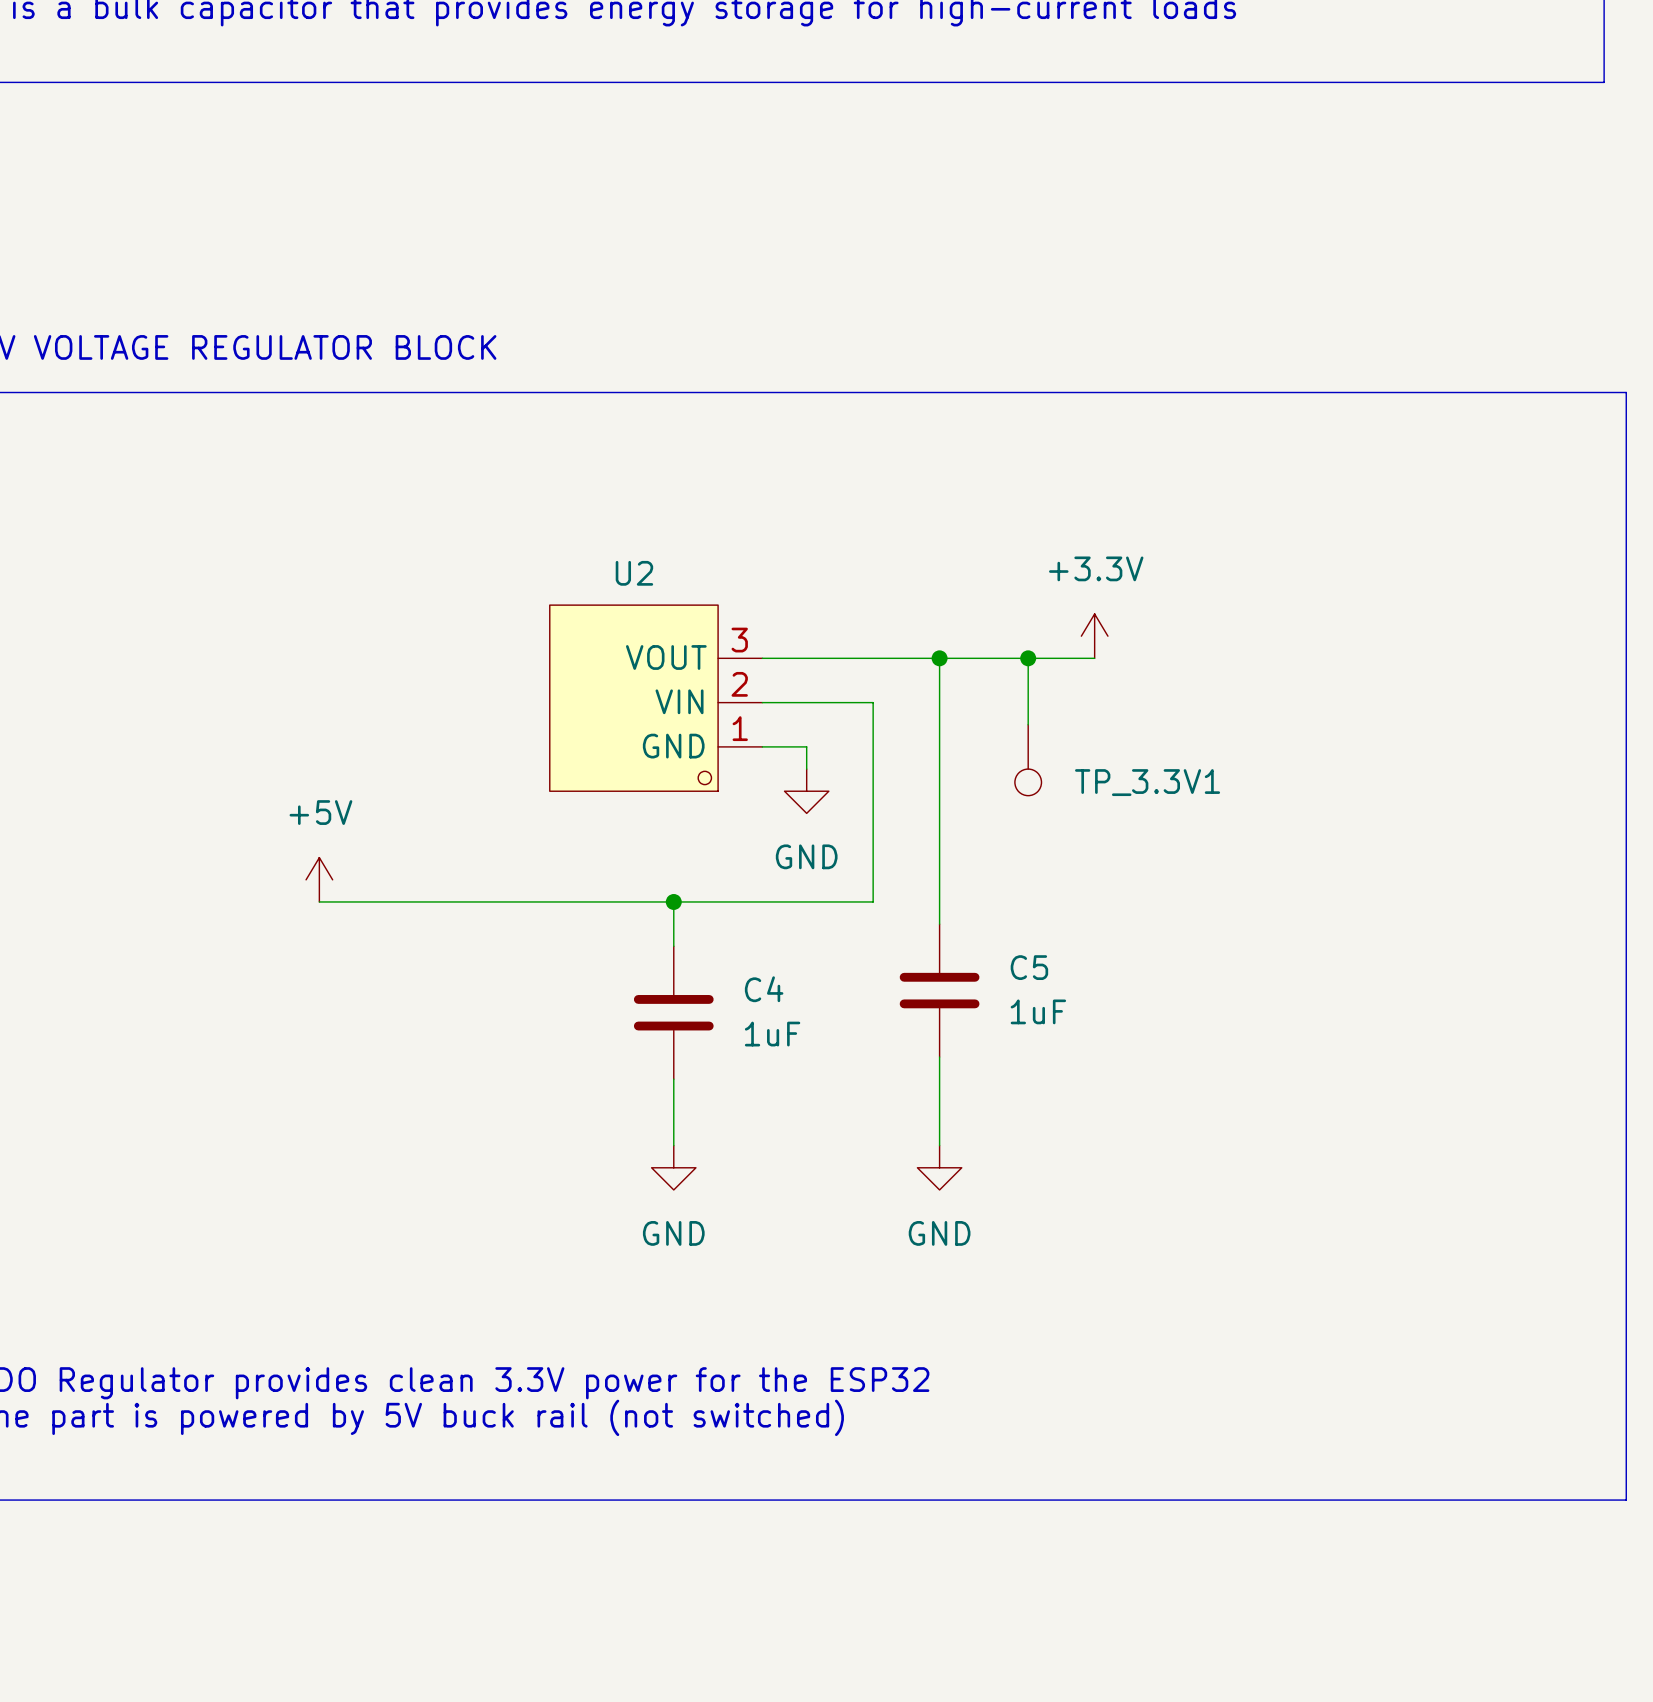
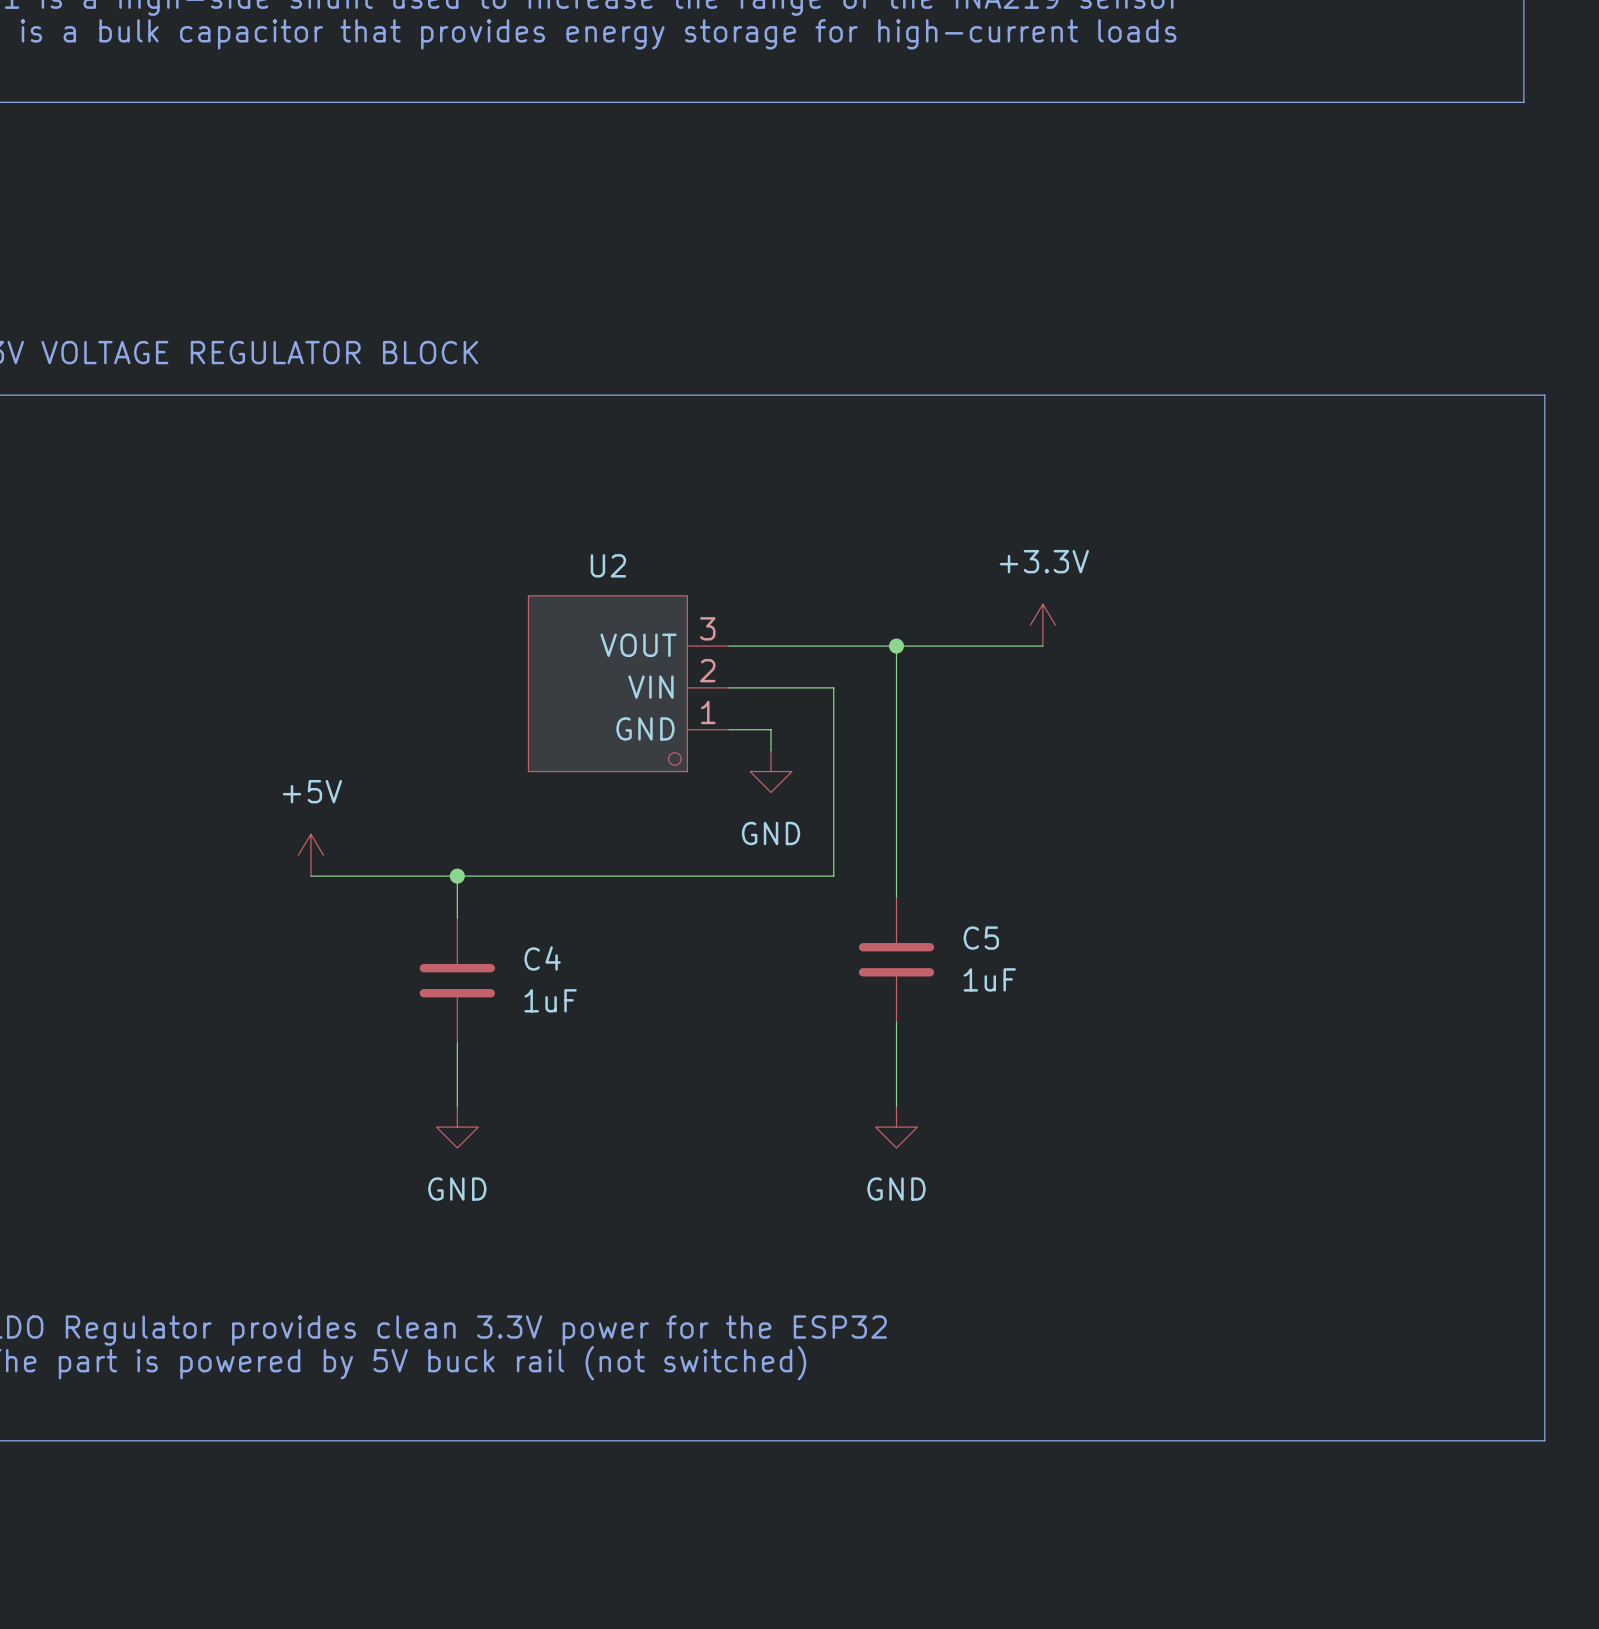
wire: (1028, 658) (1028, 724) -> none
junction: (1028, 658) -> none
TP_3.3V1: (1028, 760) -> none
junction: none -> (457, 876)
wire: (673, 901) (673, 946) -> (457, 876) (457, 917)
junction: (673, 901) -> none
C4 position: (673, 1012) -> (457, 980)
wire: (673, 1079) (673, 1145) -> (457, 1043) (457, 1106)
power symbol position: GND (673, 1167) -> GND (457, 1127)

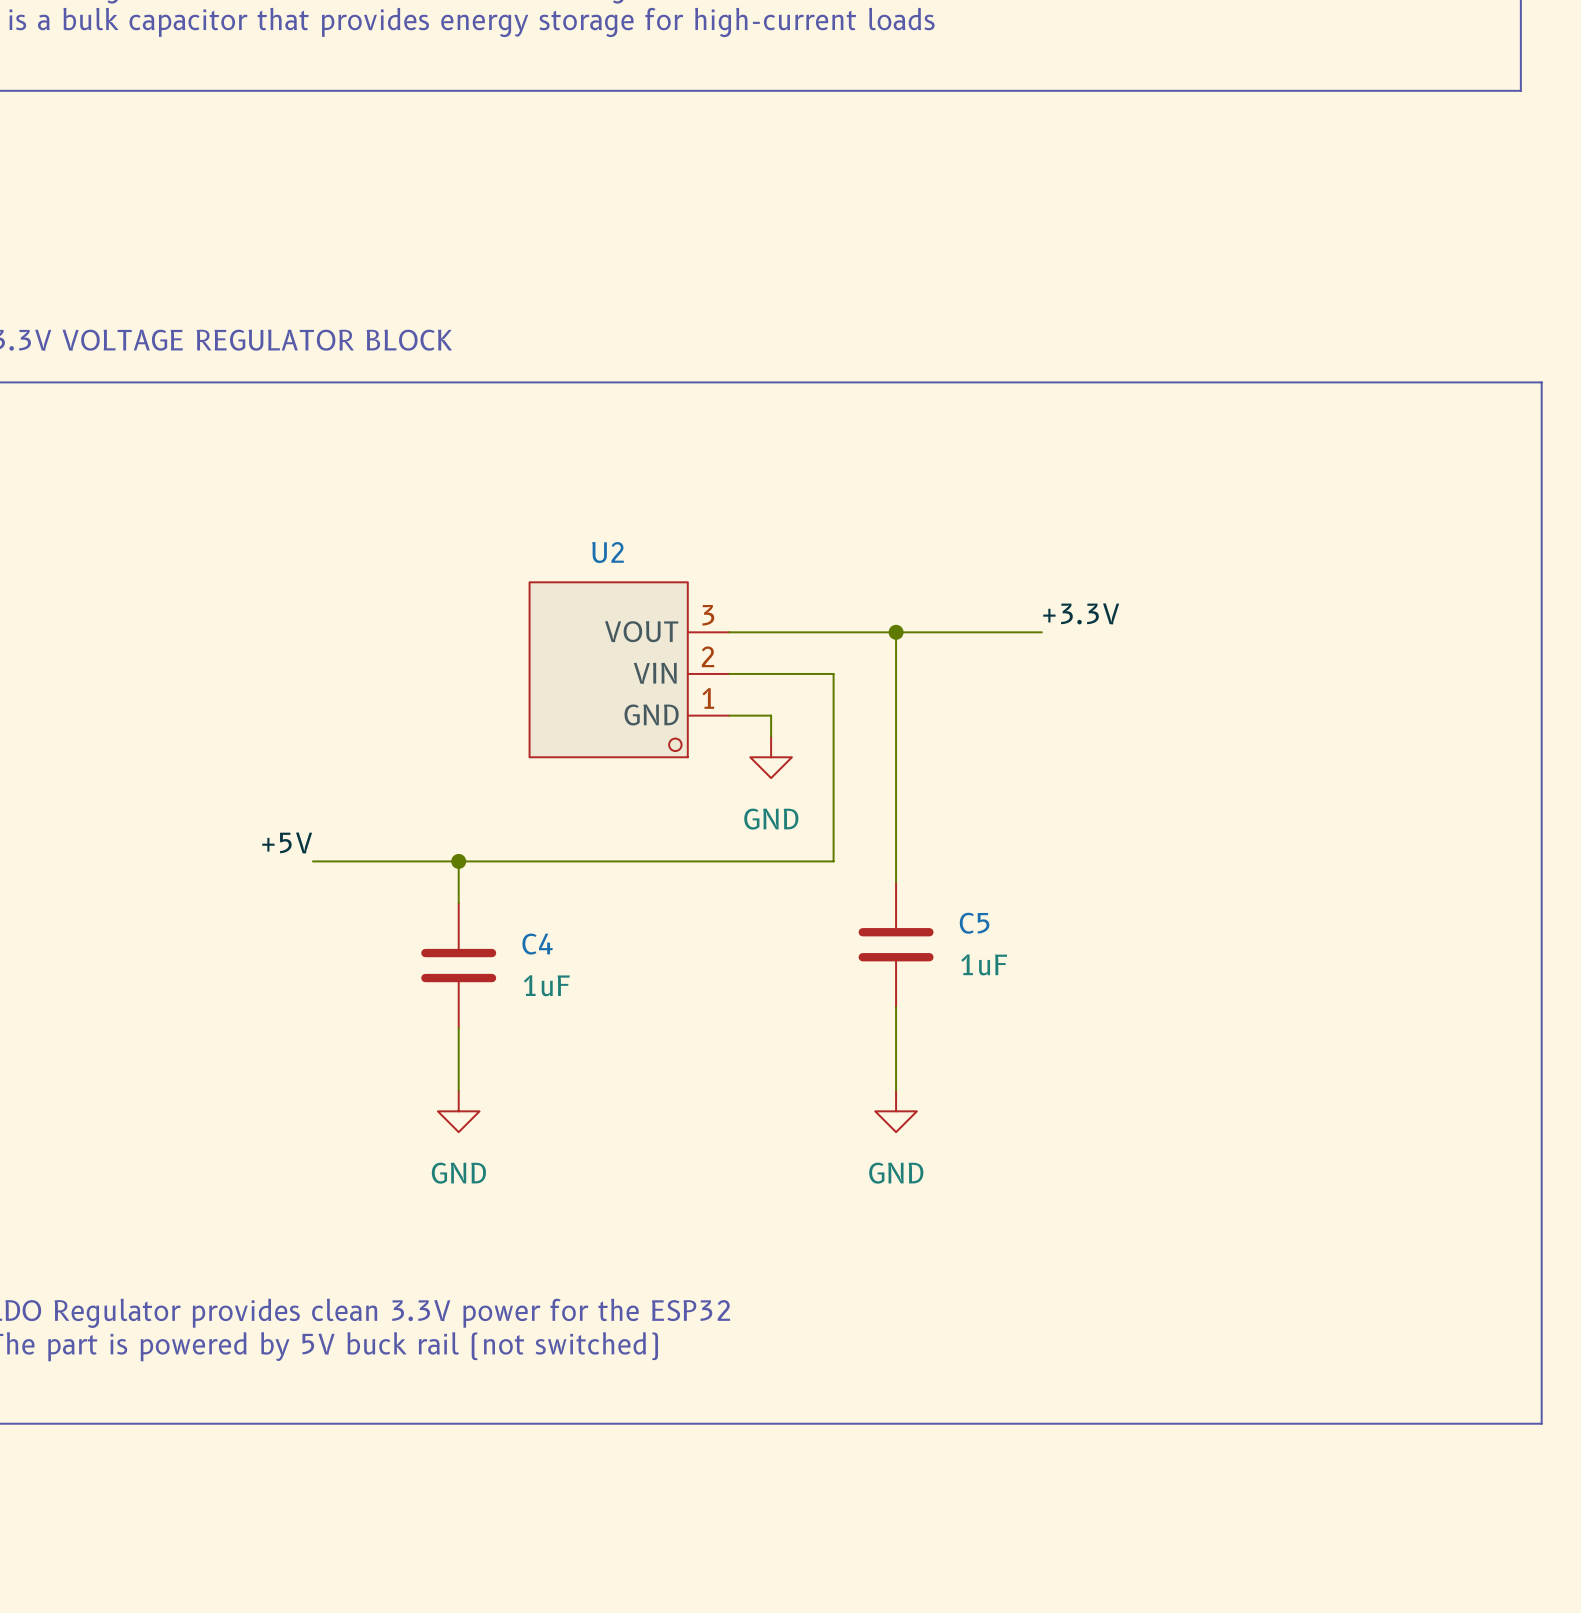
power symbol: +3.3V (1042, 625) -> none
label: none -> +3.3V (1081, 613)
power symbol: +5V (310, 855) -> none
label: none -> +5V (287, 842)

